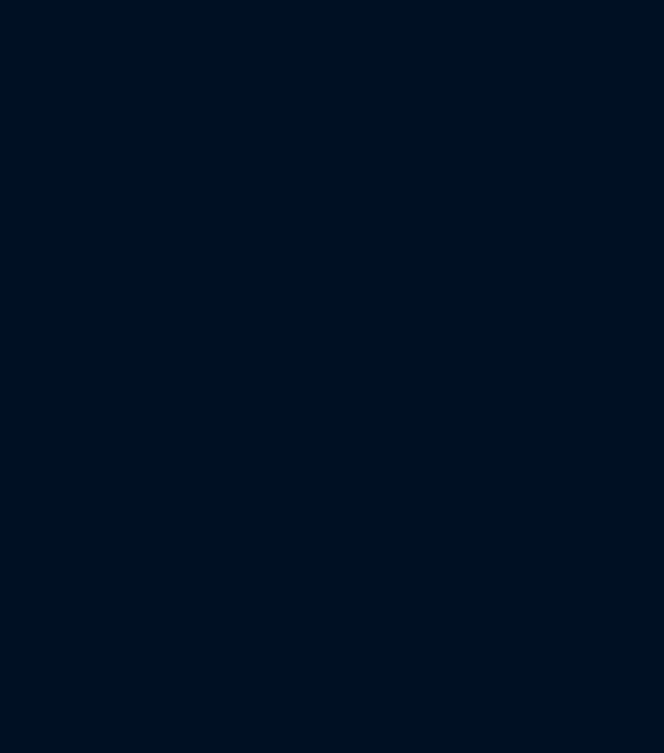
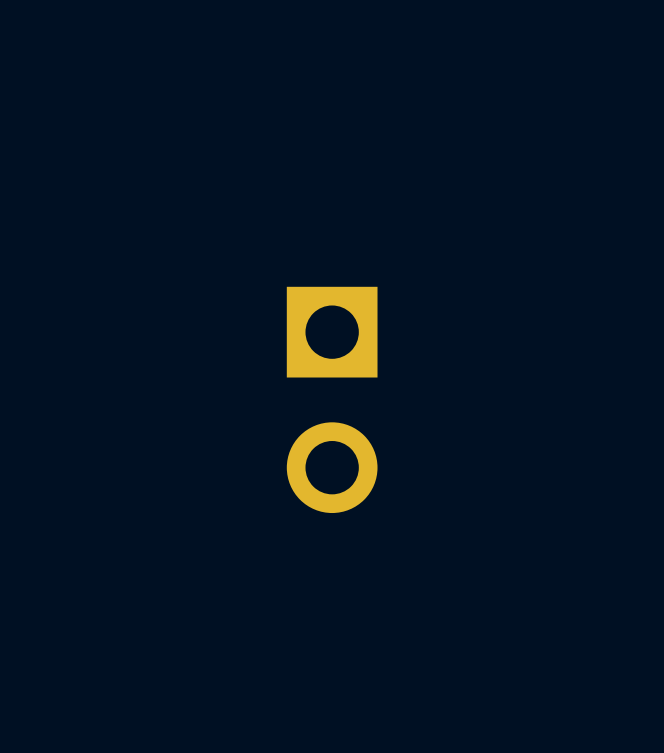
part: none -> (332, 399)

